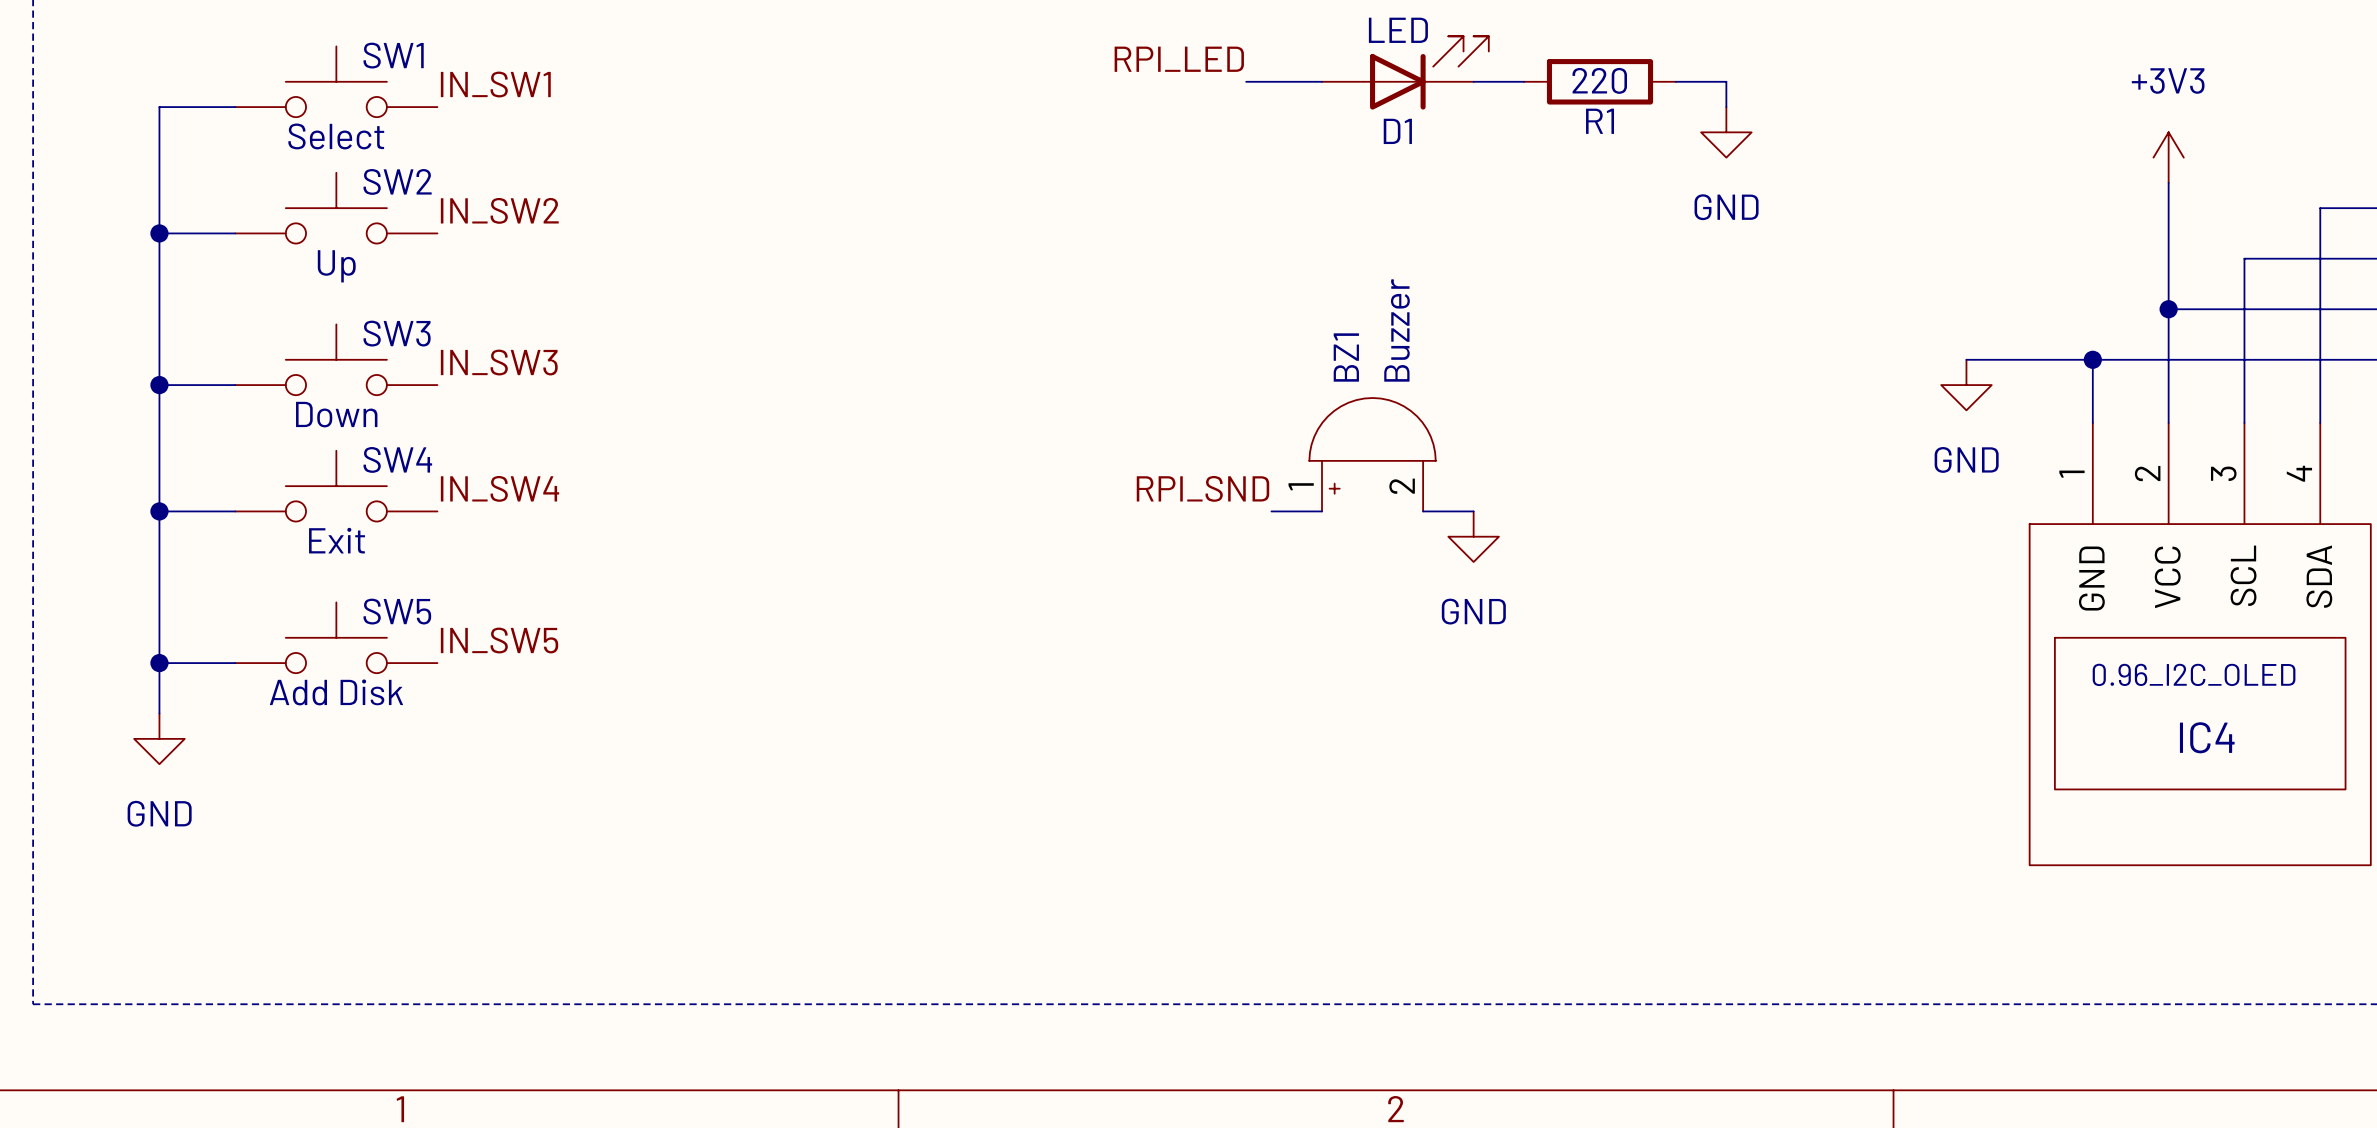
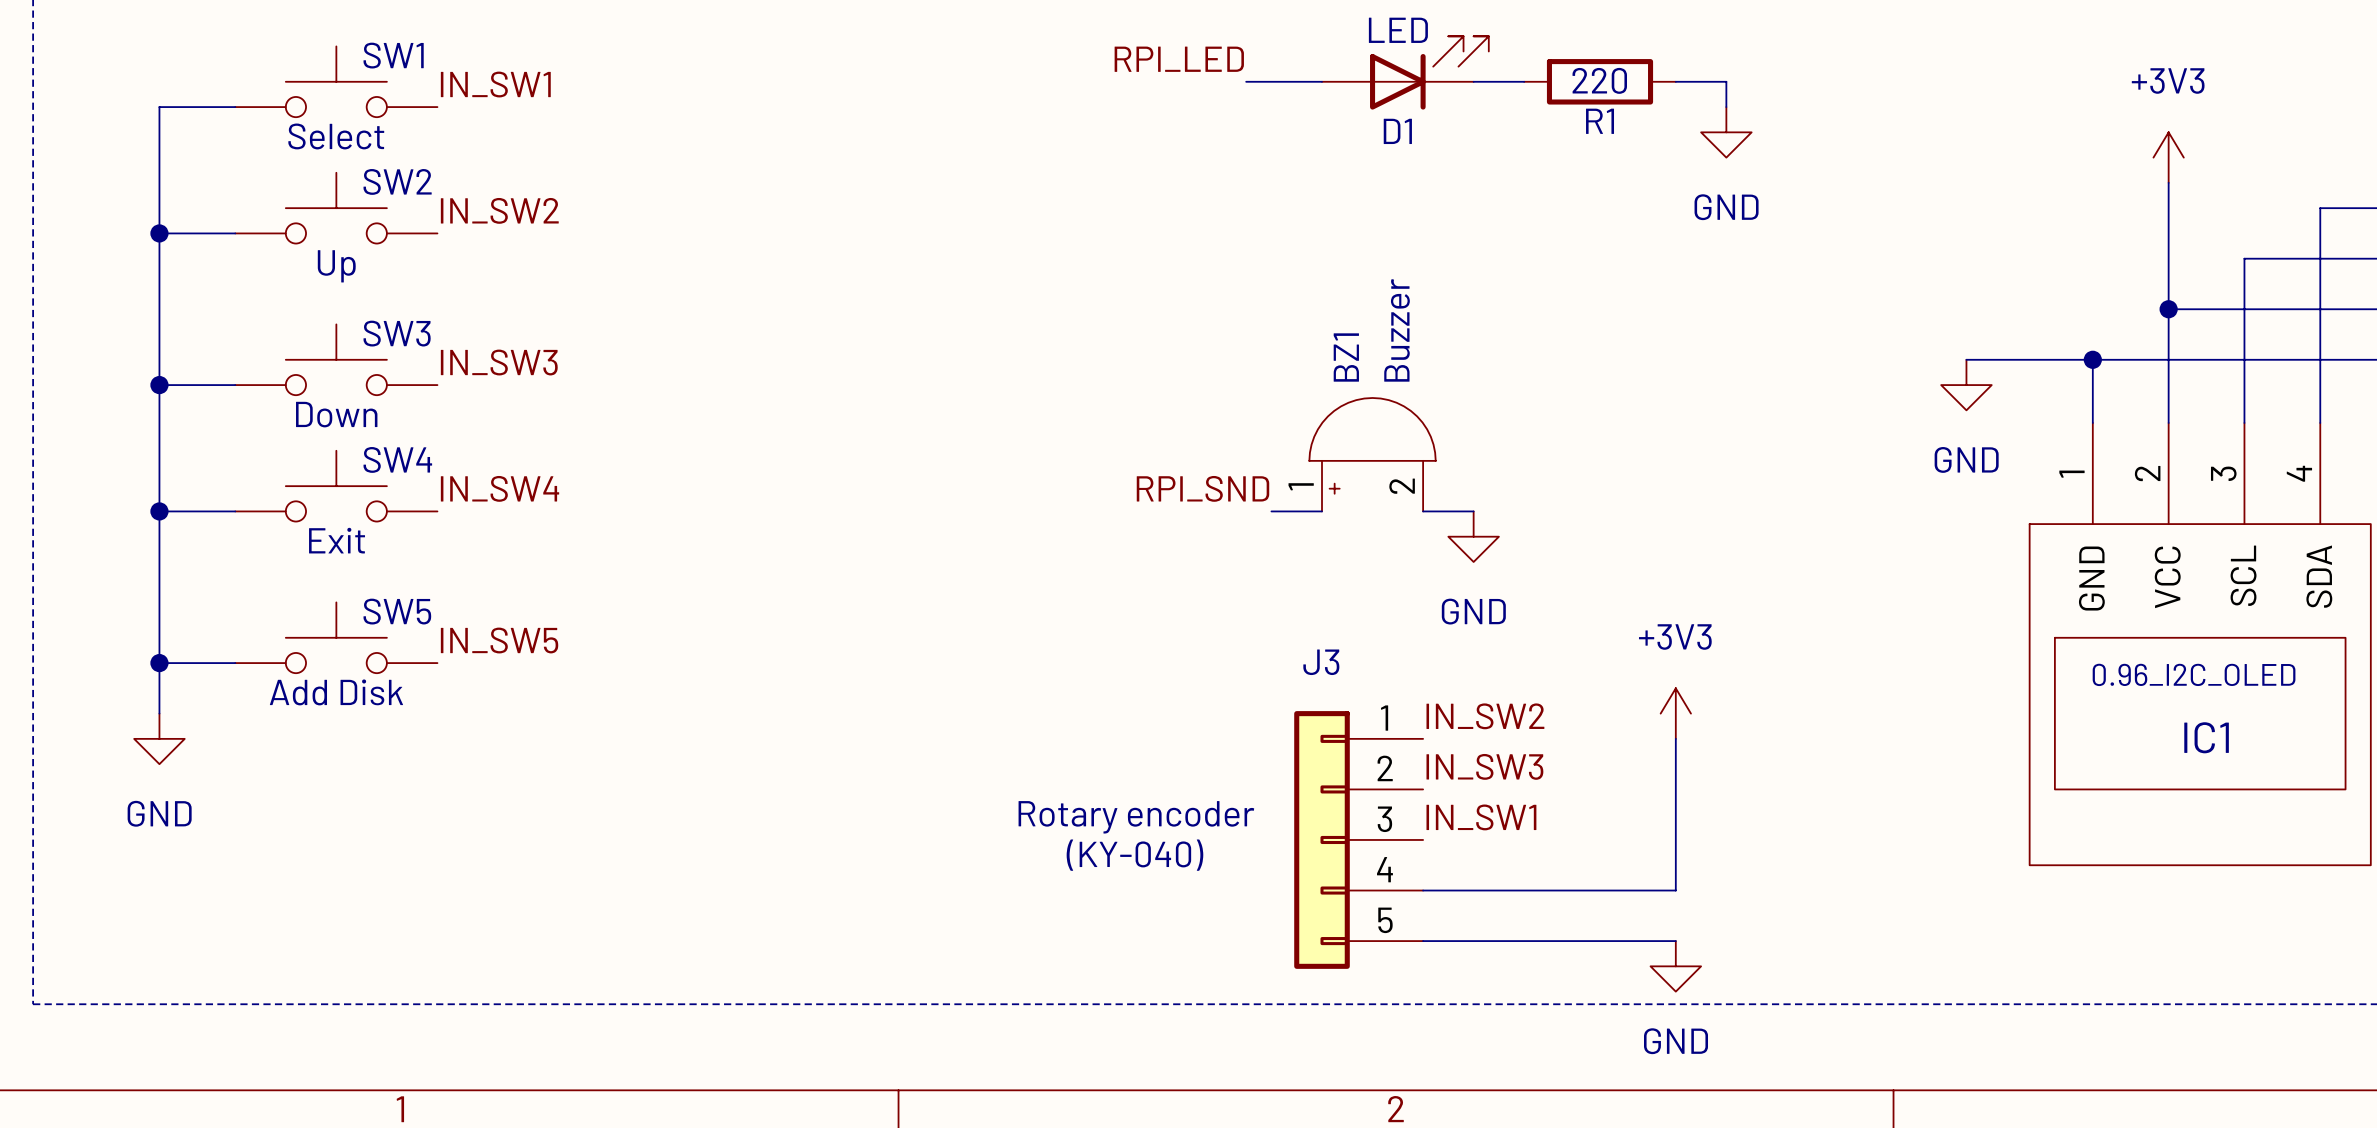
power symbol: none -> +3V3 (1675, 713)
label: none -> IN_SW2 (1485, 716)
IC4 name: IC4 (2207, 737) -> IC1 (2206, 737)
wire: none -> (1675, 738) (1675, 890) (1423, 890)
label: none -> IN_SW3 (1484, 766)
text: none -> Rotary encoder (1136, 817)
label: none -> IN_SW1 (1481, 817)
J3: none -> (1358, 839)
text: none -> (KY-040) (1134, 855)
wire: none -> (1423, 941) (1675, 941)
power symbol: none -> GND (1675, 966)

